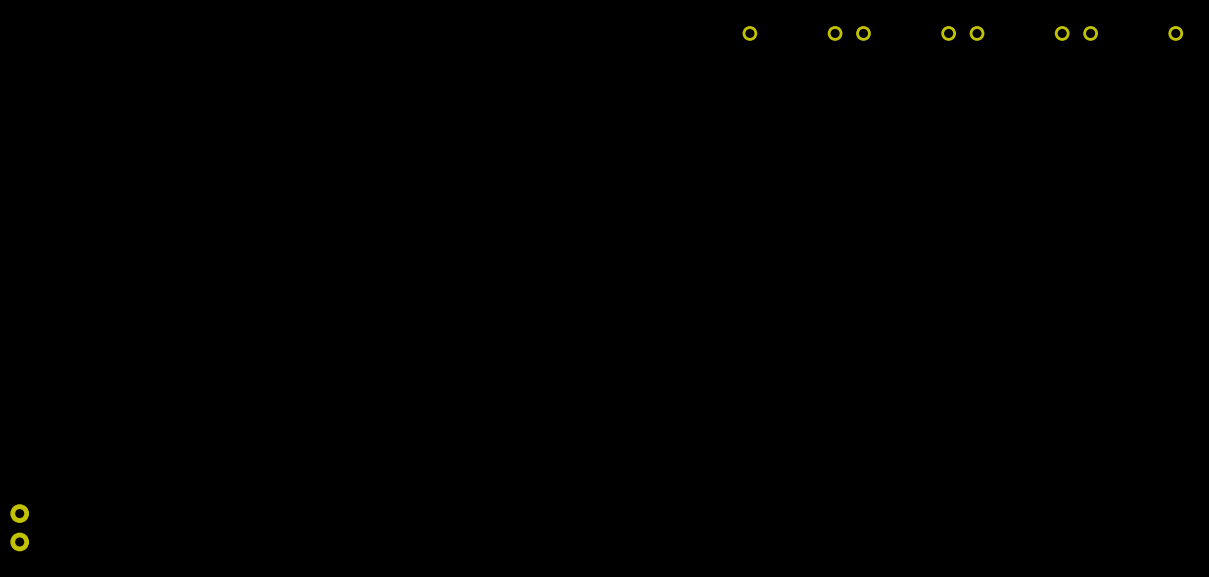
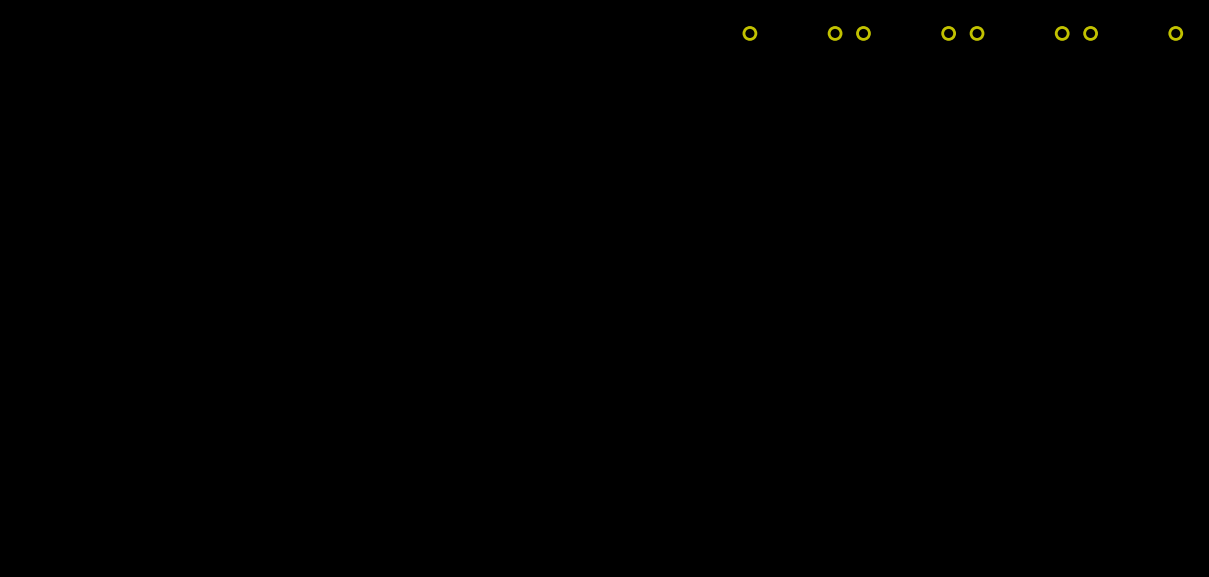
part: (19, 527) -> none

